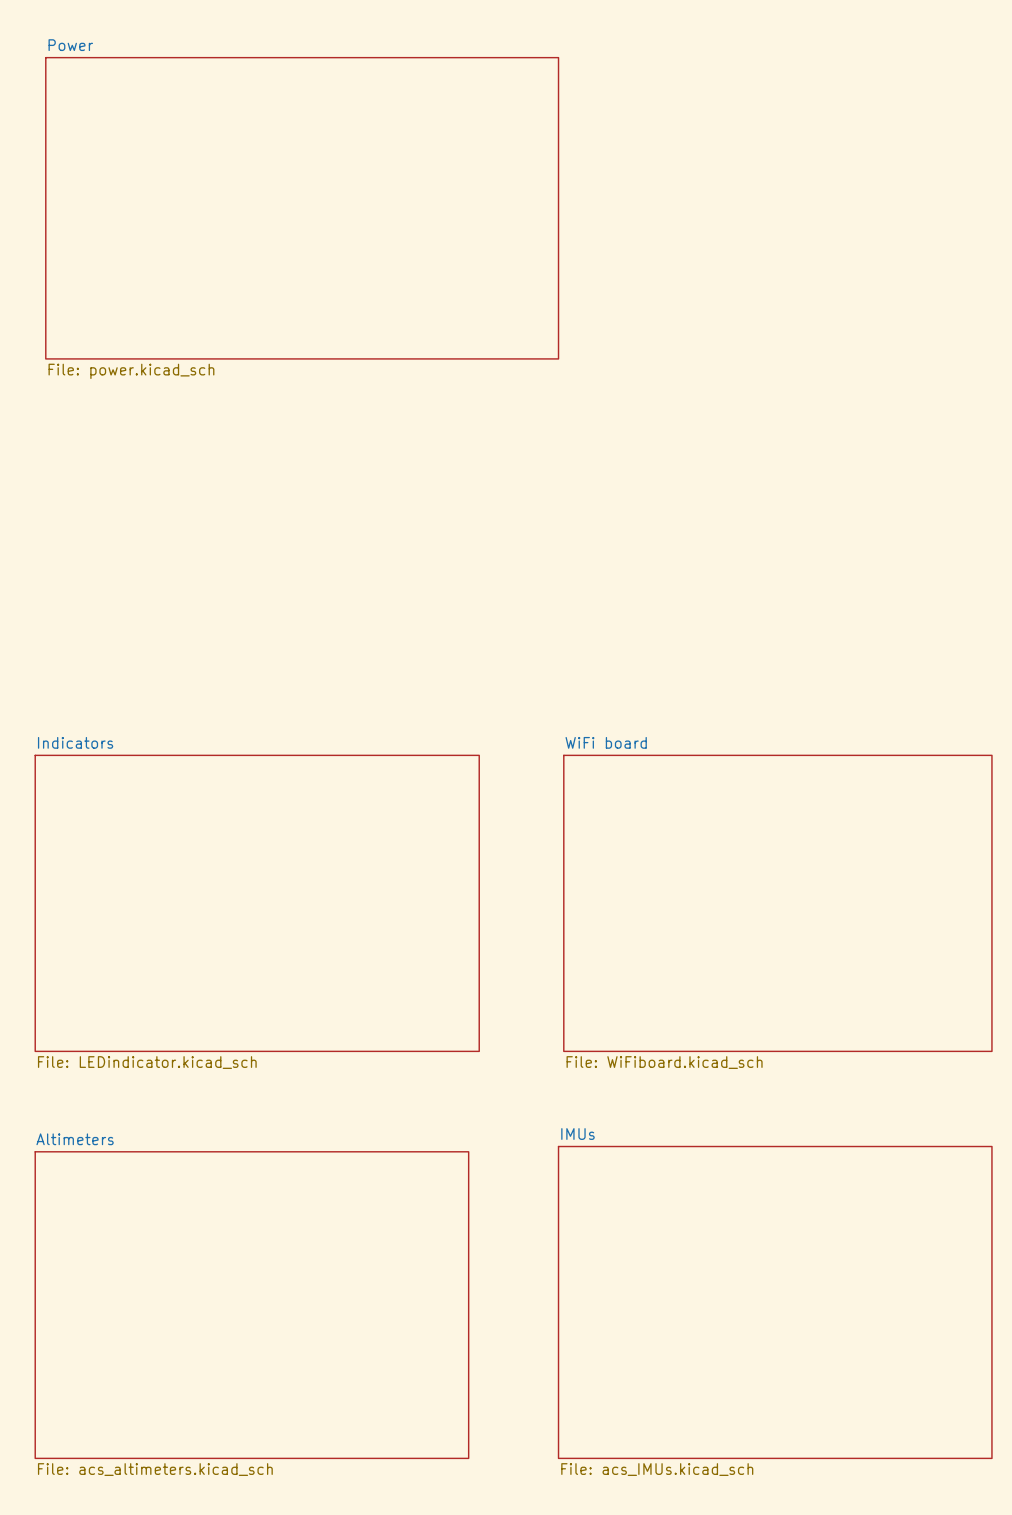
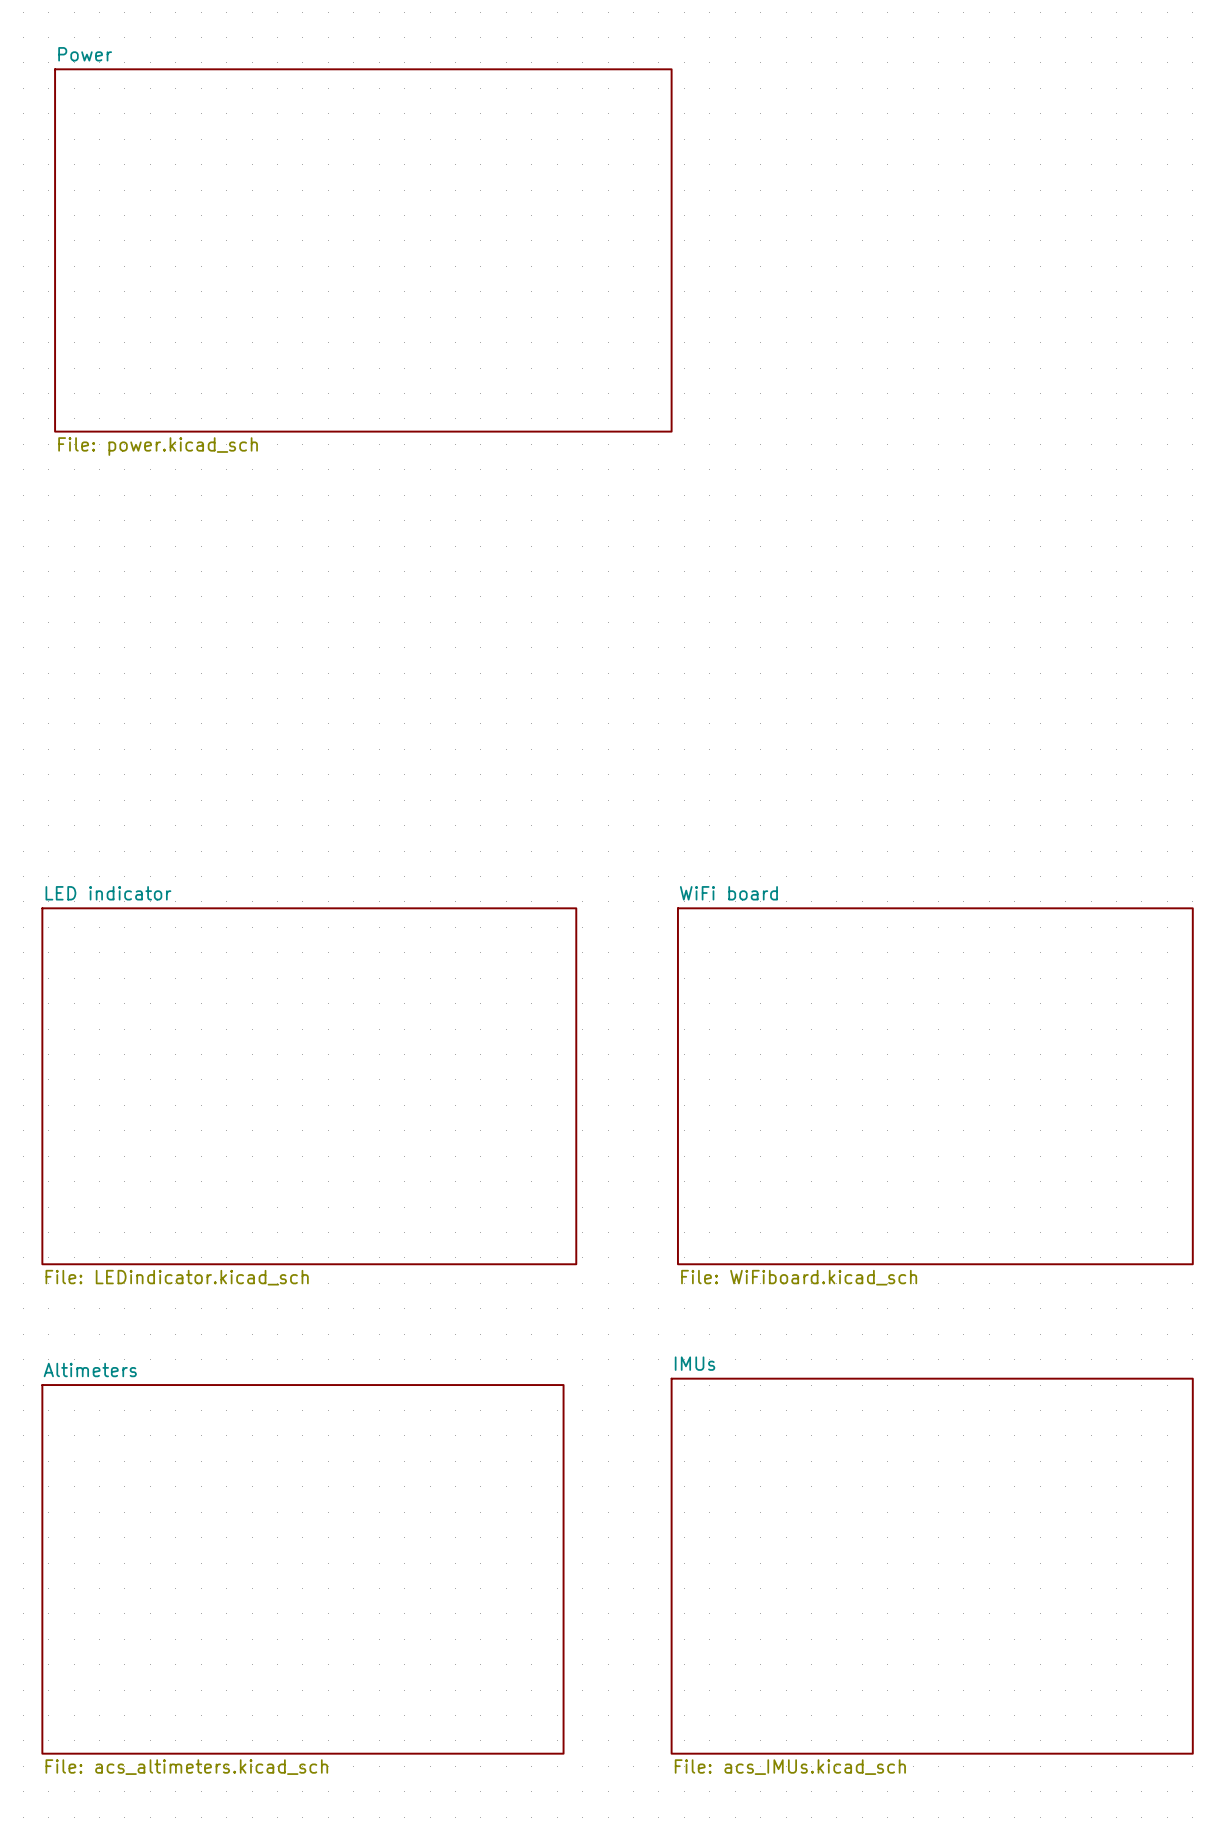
sheet Indicators name: Indicators (75, 742) -> LED indicator (108, 893)

